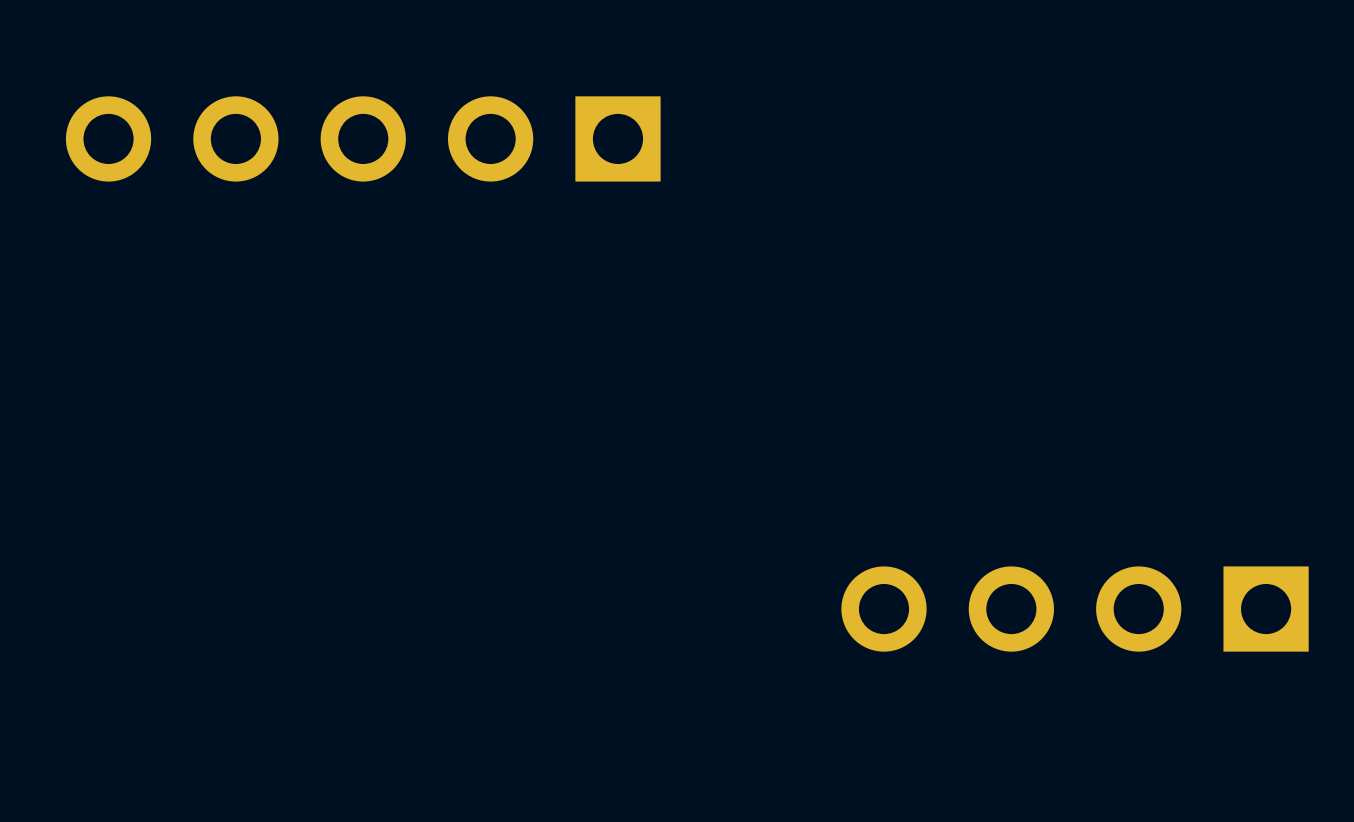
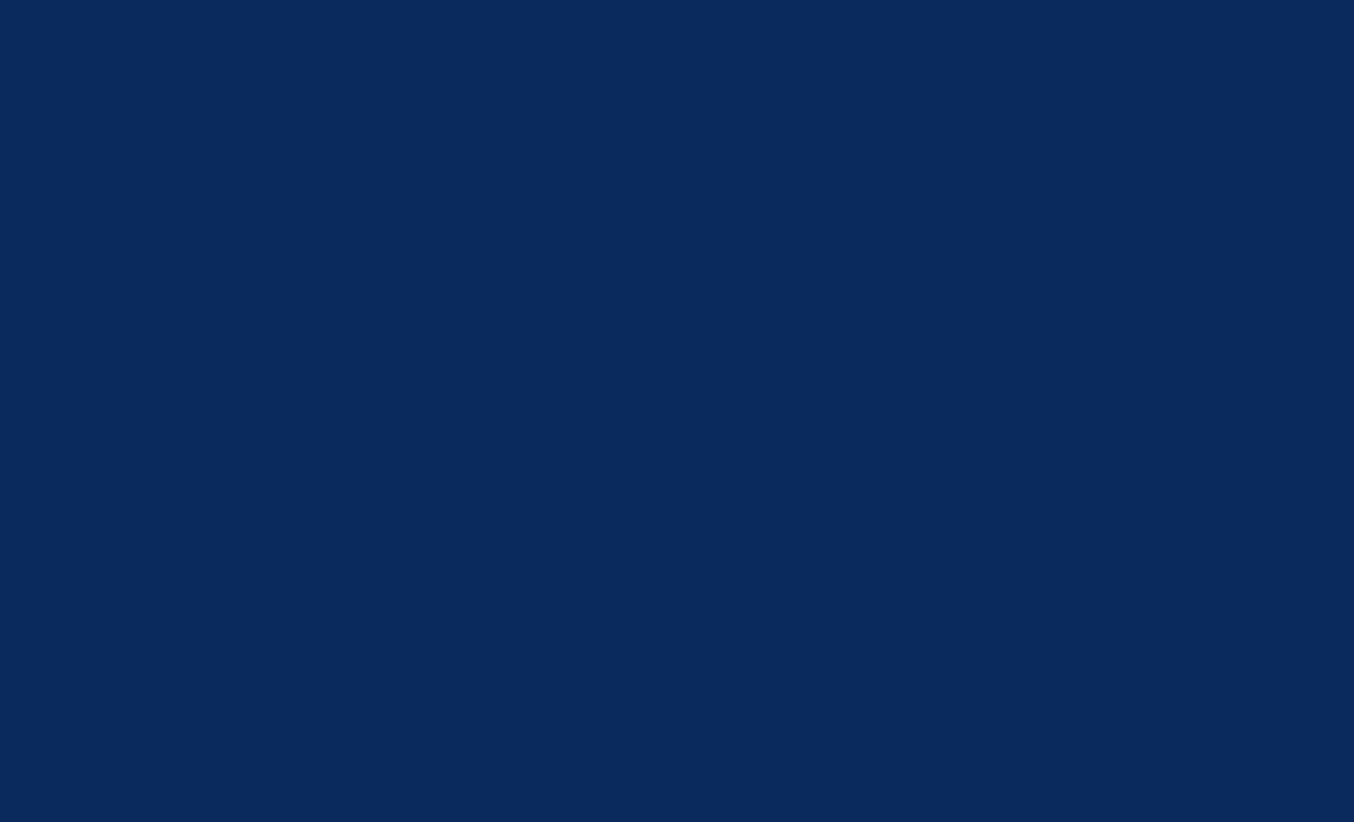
part: (363, 138) -> none
part: (1075, 609) -> none

